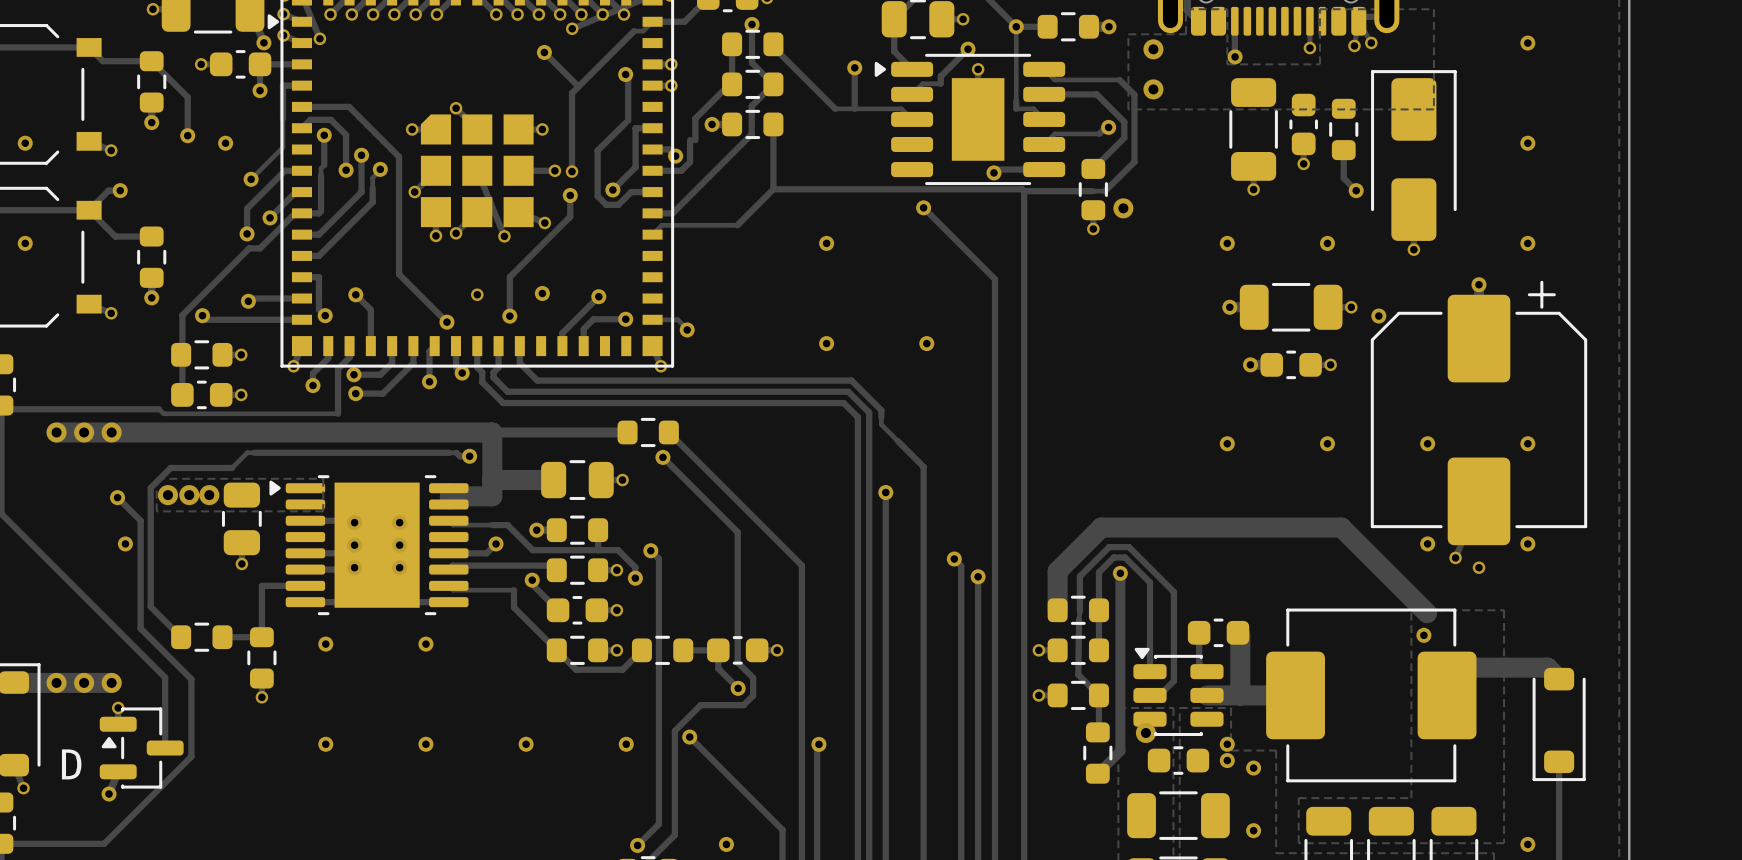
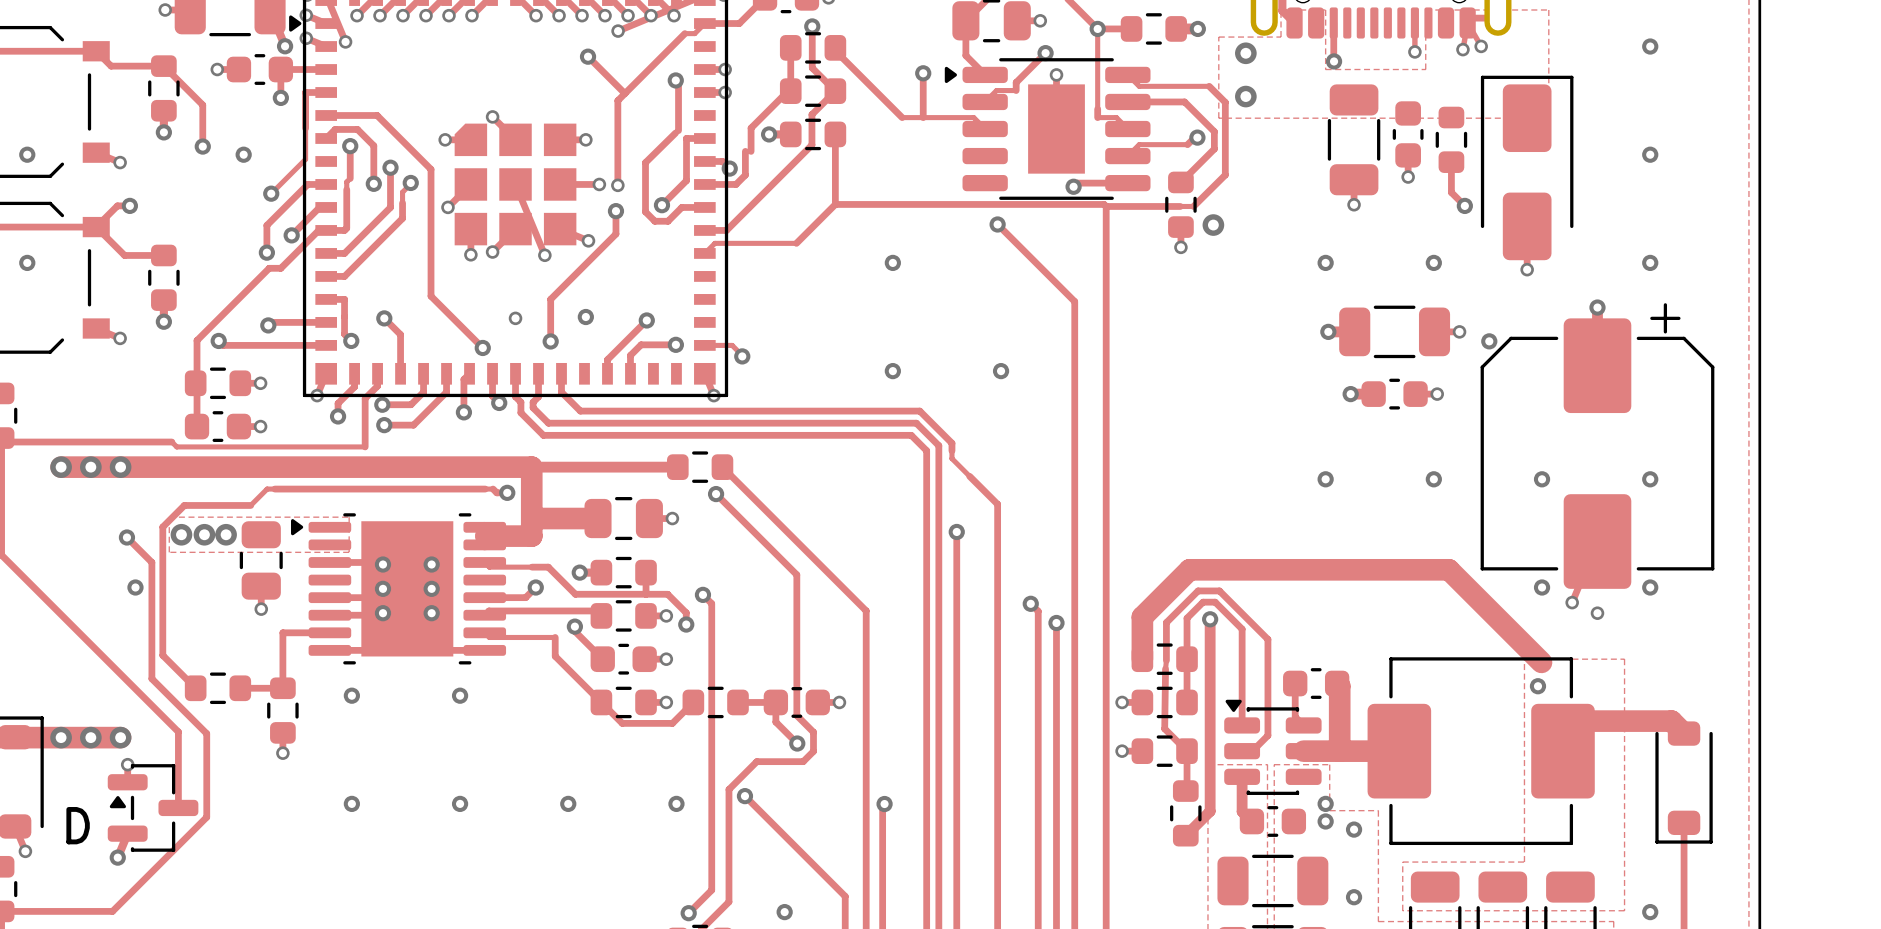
track: none -> (1242, 776) (1242, 811) (1251, 821)
via: (1145, 732) -> none

